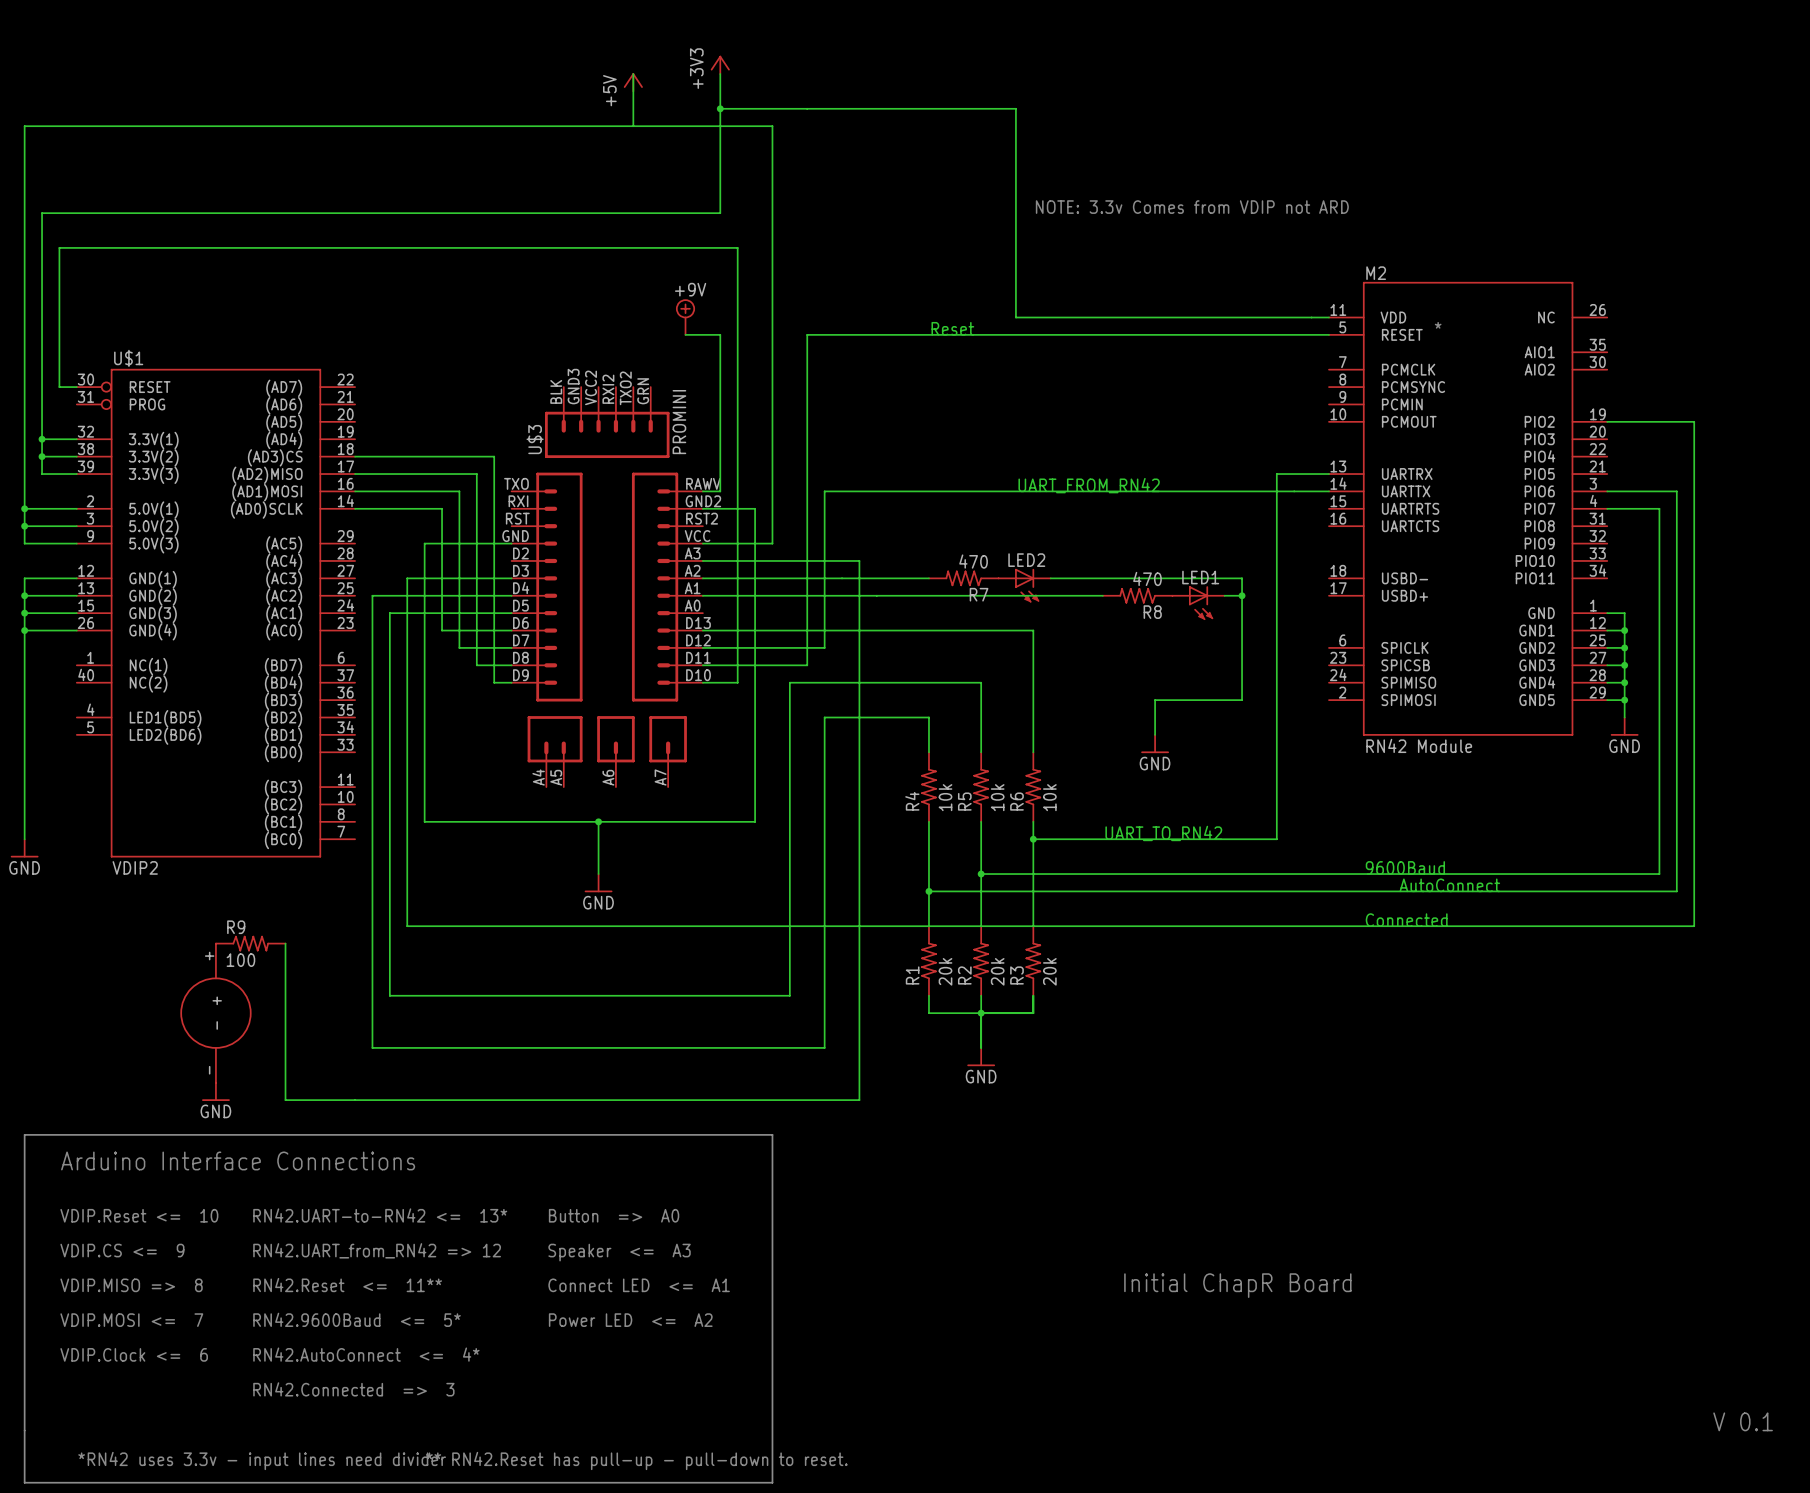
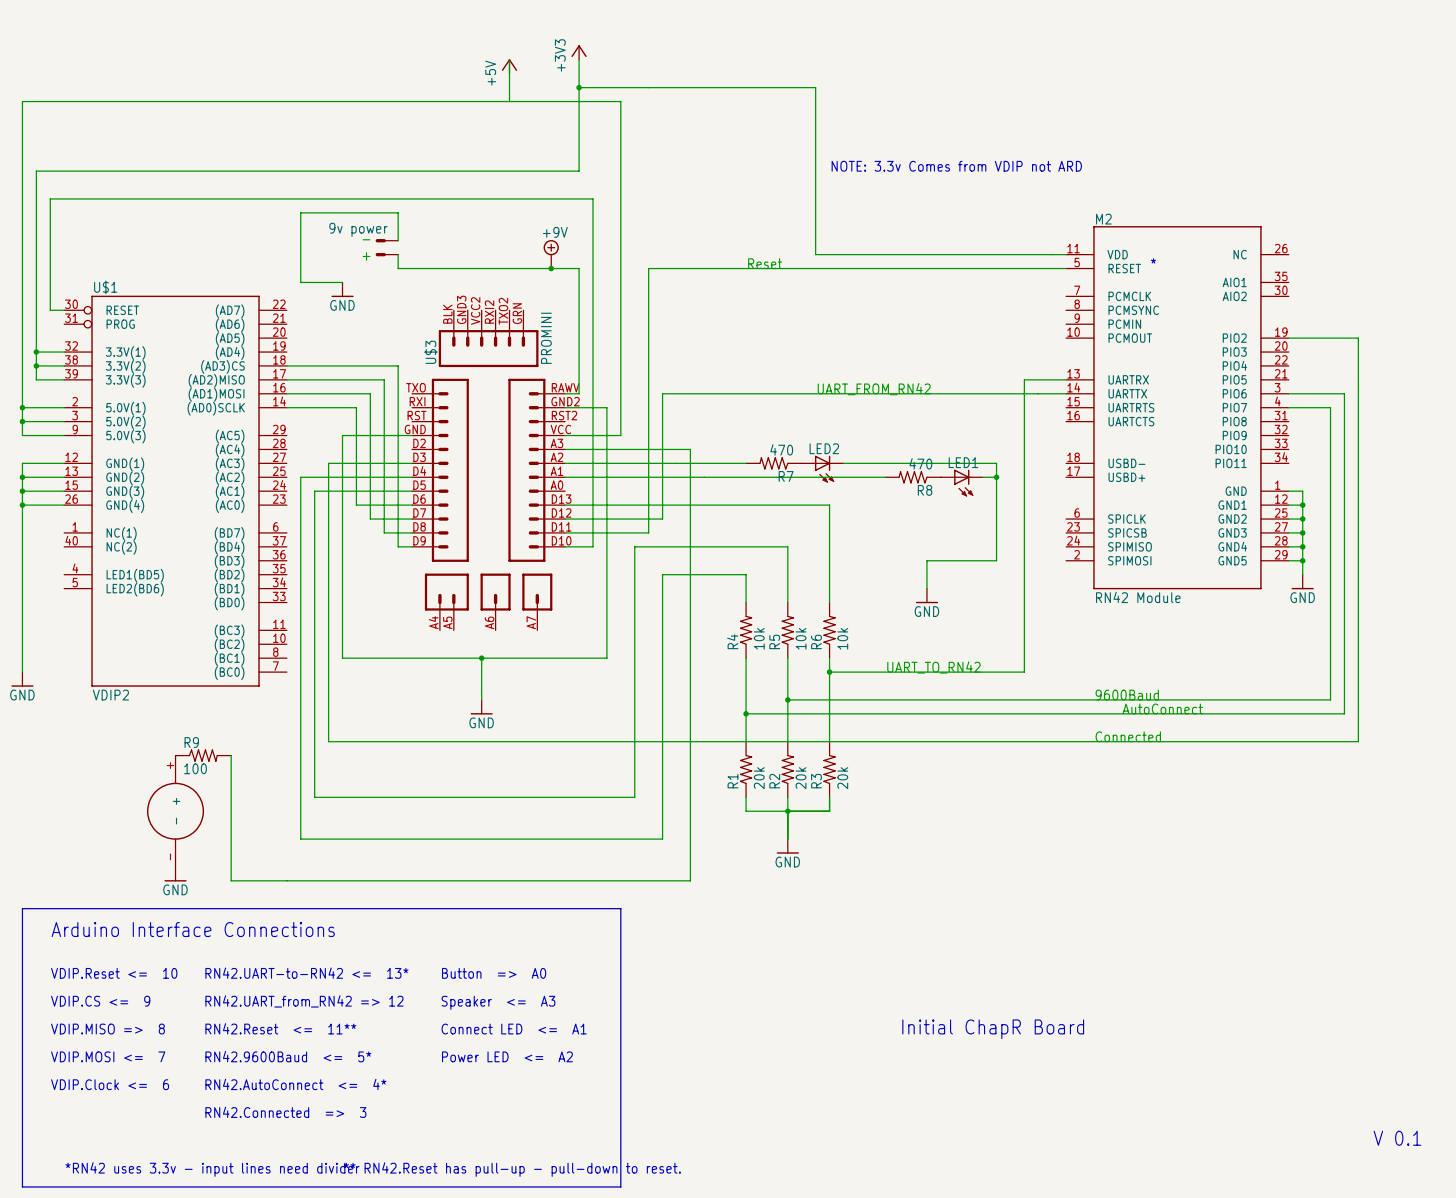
text: none -> - (366, 239)
part: none -> 9v power (386, 240)
wire: none -> (398, 240) (398, 212) (300, 212) (300, 282) (342, 282)
part: none -> (386, 254)
wire: none -> (398, 254) (398, 268) (551, 268)
text: none -> + (366, 256)
junction: none -> (551, 268)
power symbol: none -> GND (342, 289)

